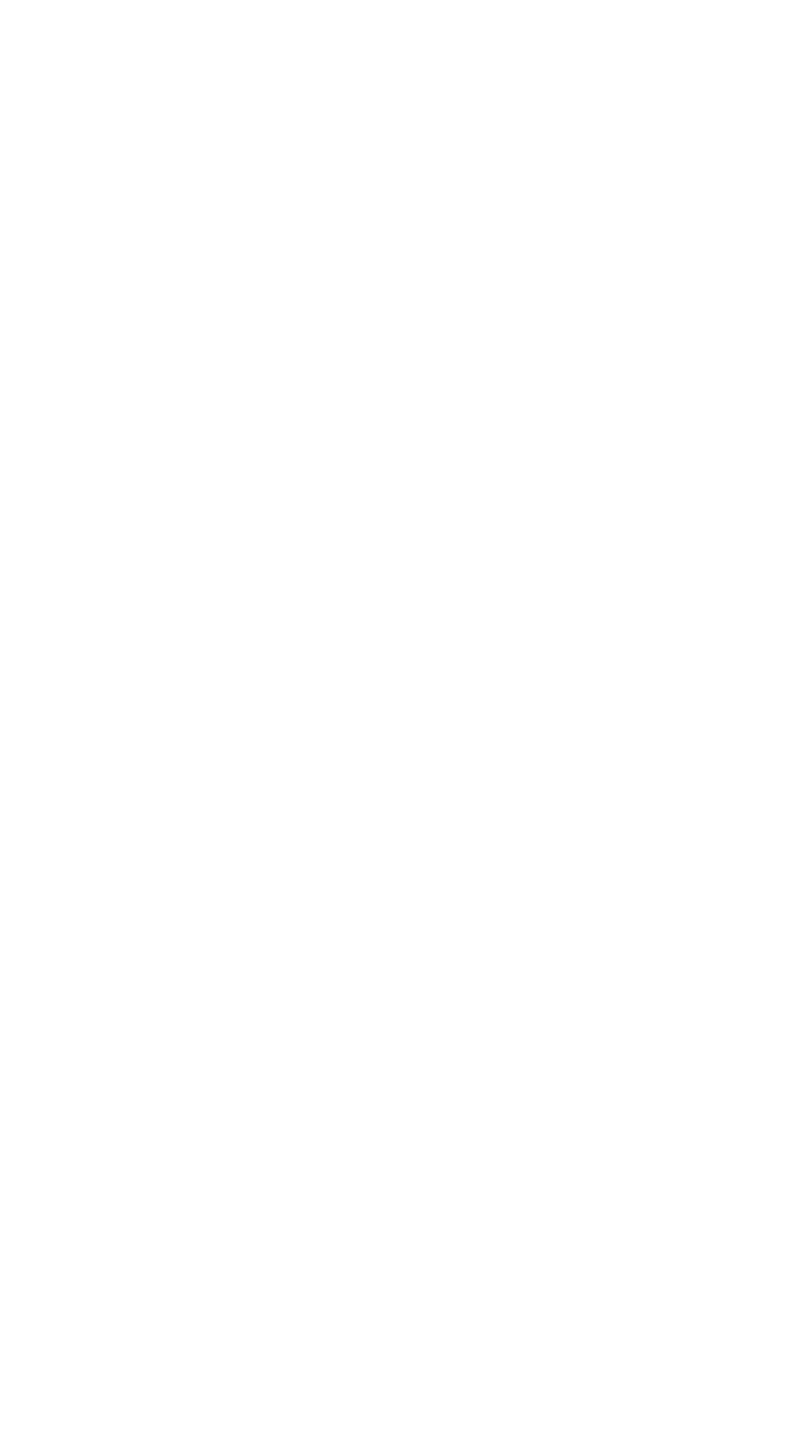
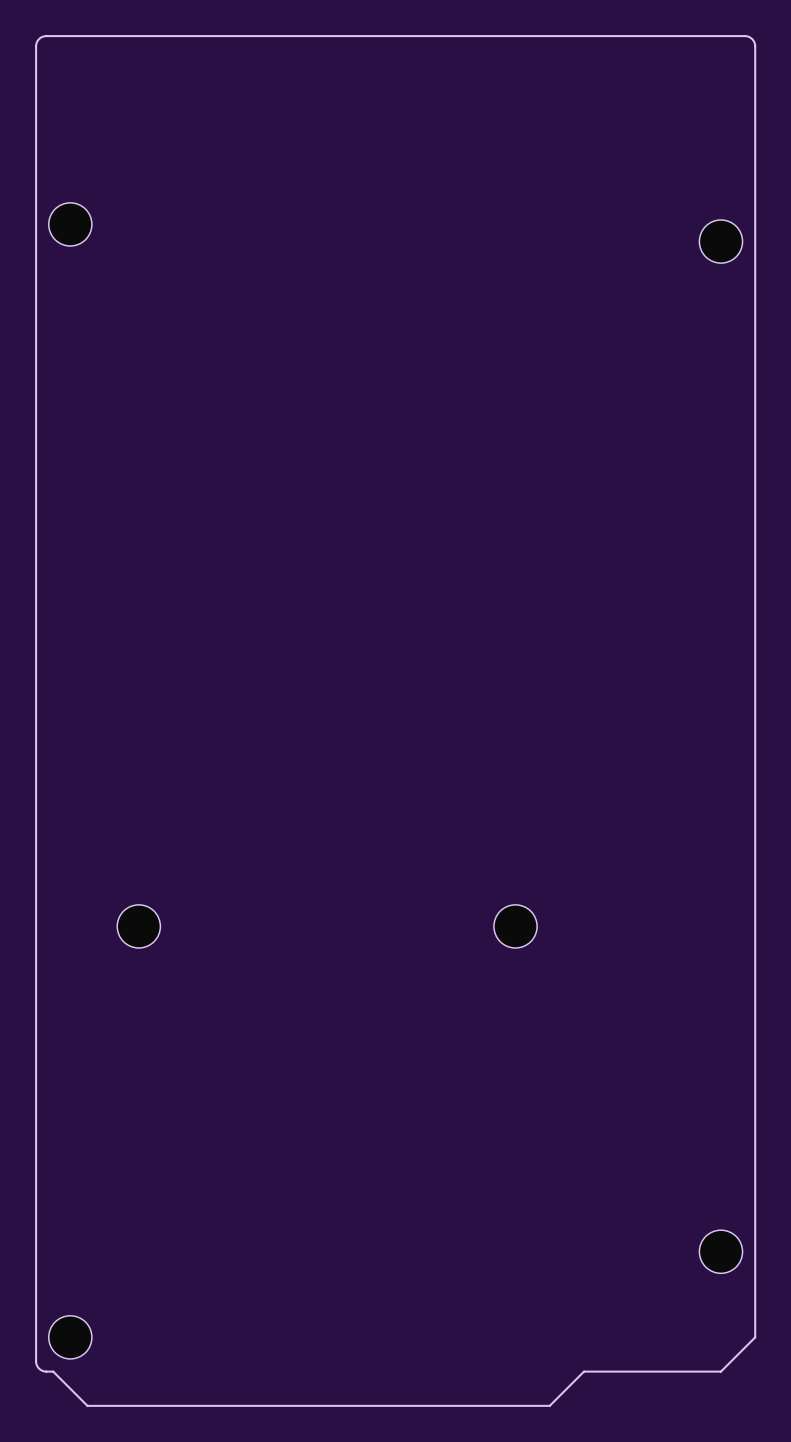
board edge: none -> (46, 36) (744, 36) (753, 41) (755, 1337) (720, 1371) (583, 1371) (549, 1405) (87, 1405) (53, 1371) (43, 1371) (37, 1366) (36, 46) (39, 39) (46, 36)
part: none -> (70, 224)
part: none -> (720, 241)
part: none -> (138, 926)
part: none -> (515, 926)
part: none -> (720, 1251)
part: none -> (70, 1337)

